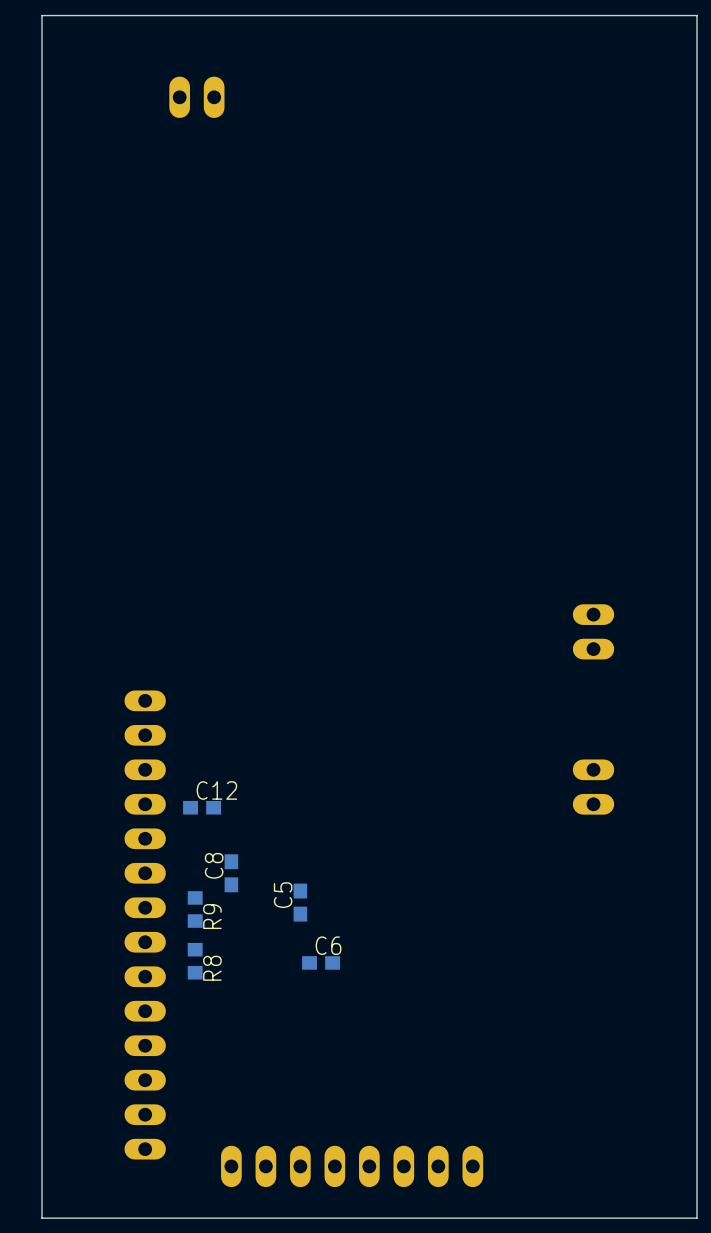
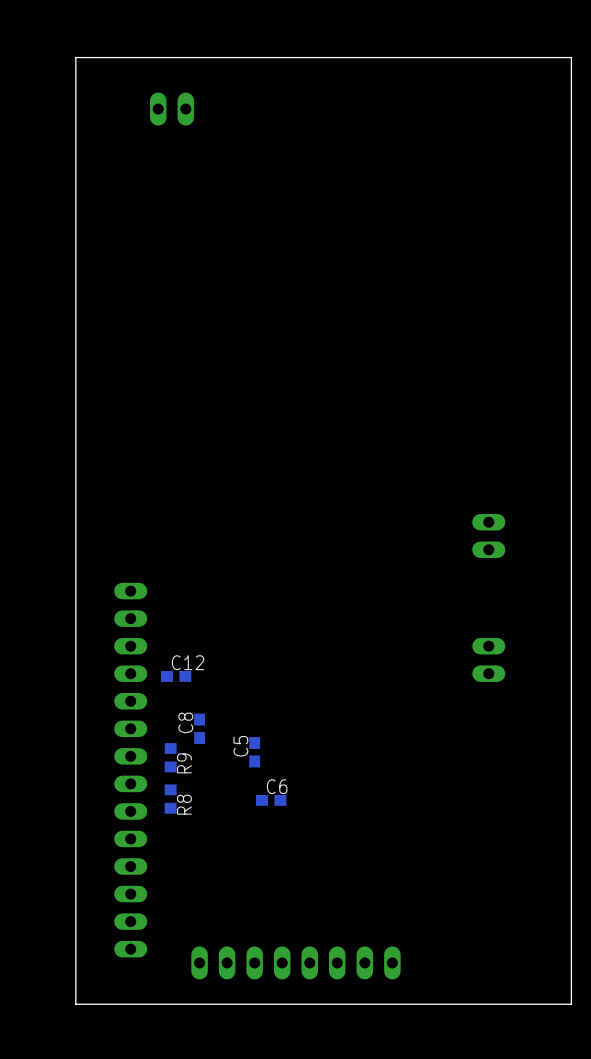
board edge: (696, 32) (696, 15) (41, 15) (41, 1218) (76, 1218) -> (571, 57) (75, 57) (75, 1004)

